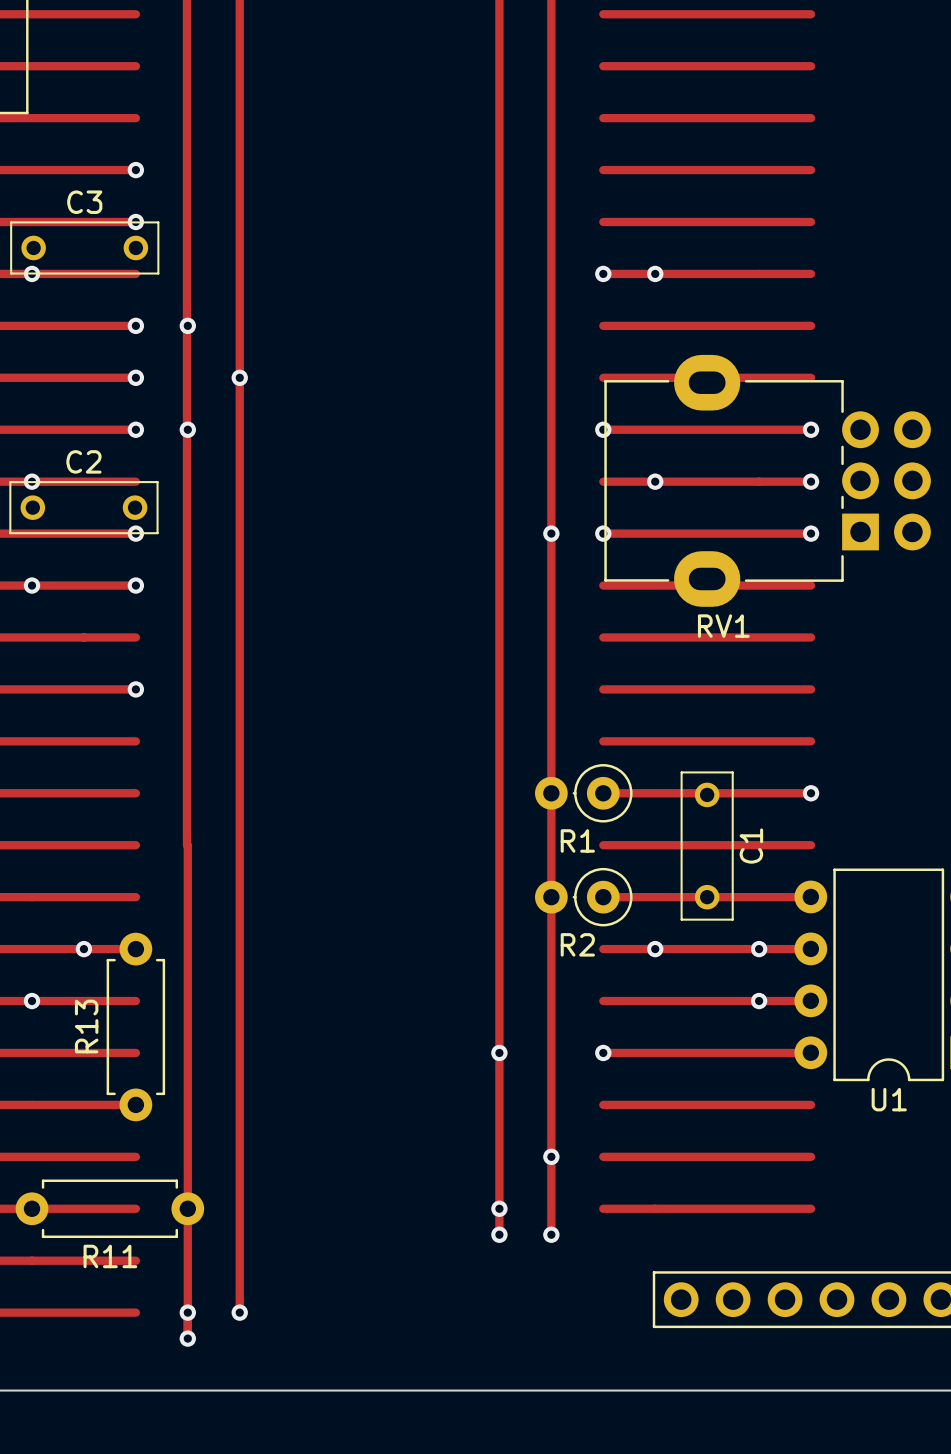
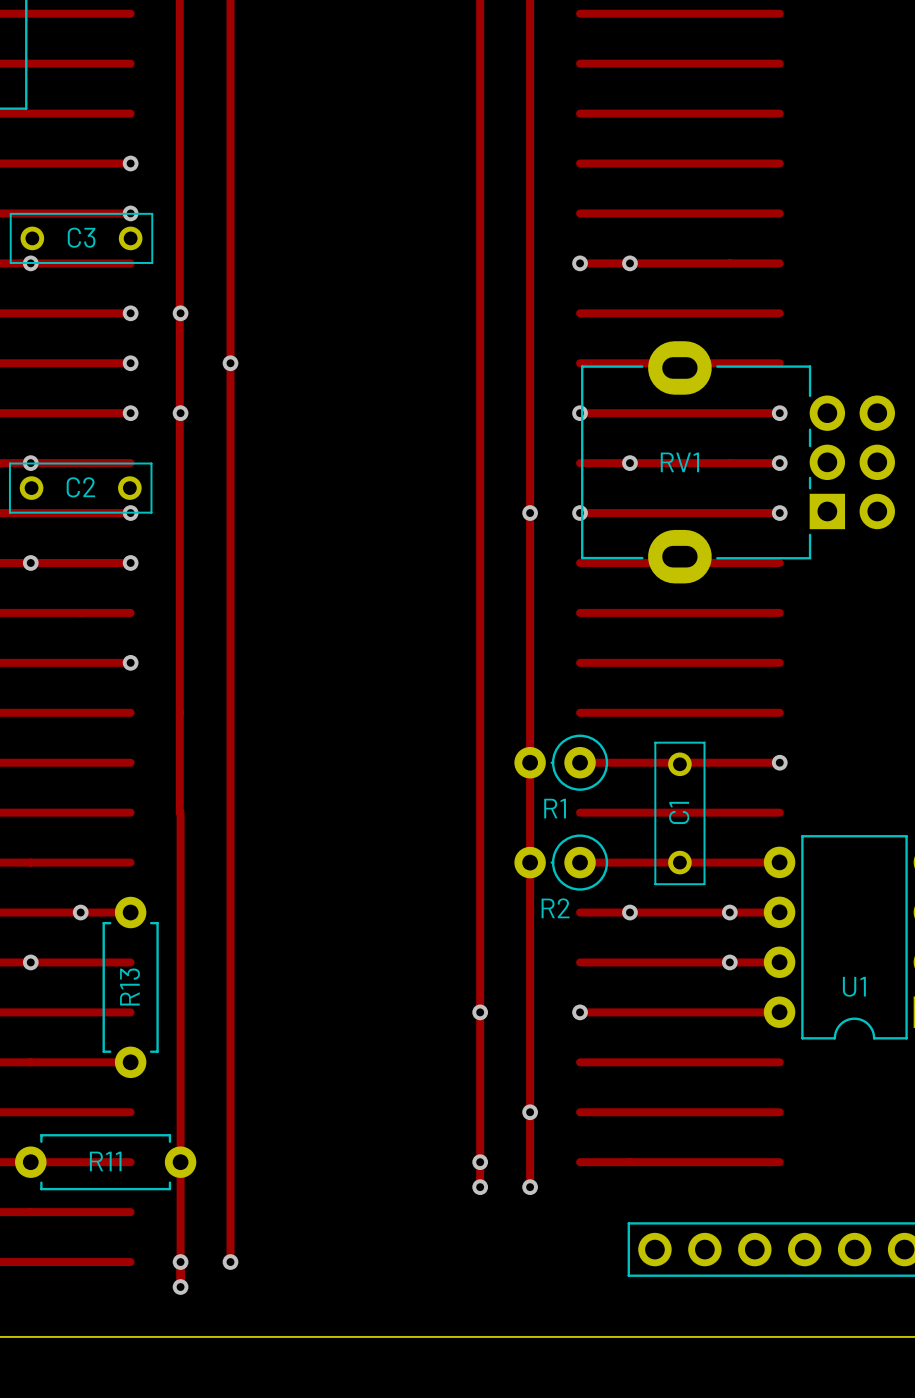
C3 name position: C3 (84, 202) -> C3 (81, 237)
C2 name position: C2 (83, 461) -> C2 (80, 487)
RV1 name position: RV1 (723, 626) -> RV1 (679, 462)
C1 name position: C1 (751, 846) -> C1 (679, 812)
R13 name position: R13 (86, 1026) -> R13 (130, 987)
U1 name position: U1 (889, 1099) -> U1 (854, 986)
R11 name position: R11 (110, 1256) -> R11 (105, 1161)

